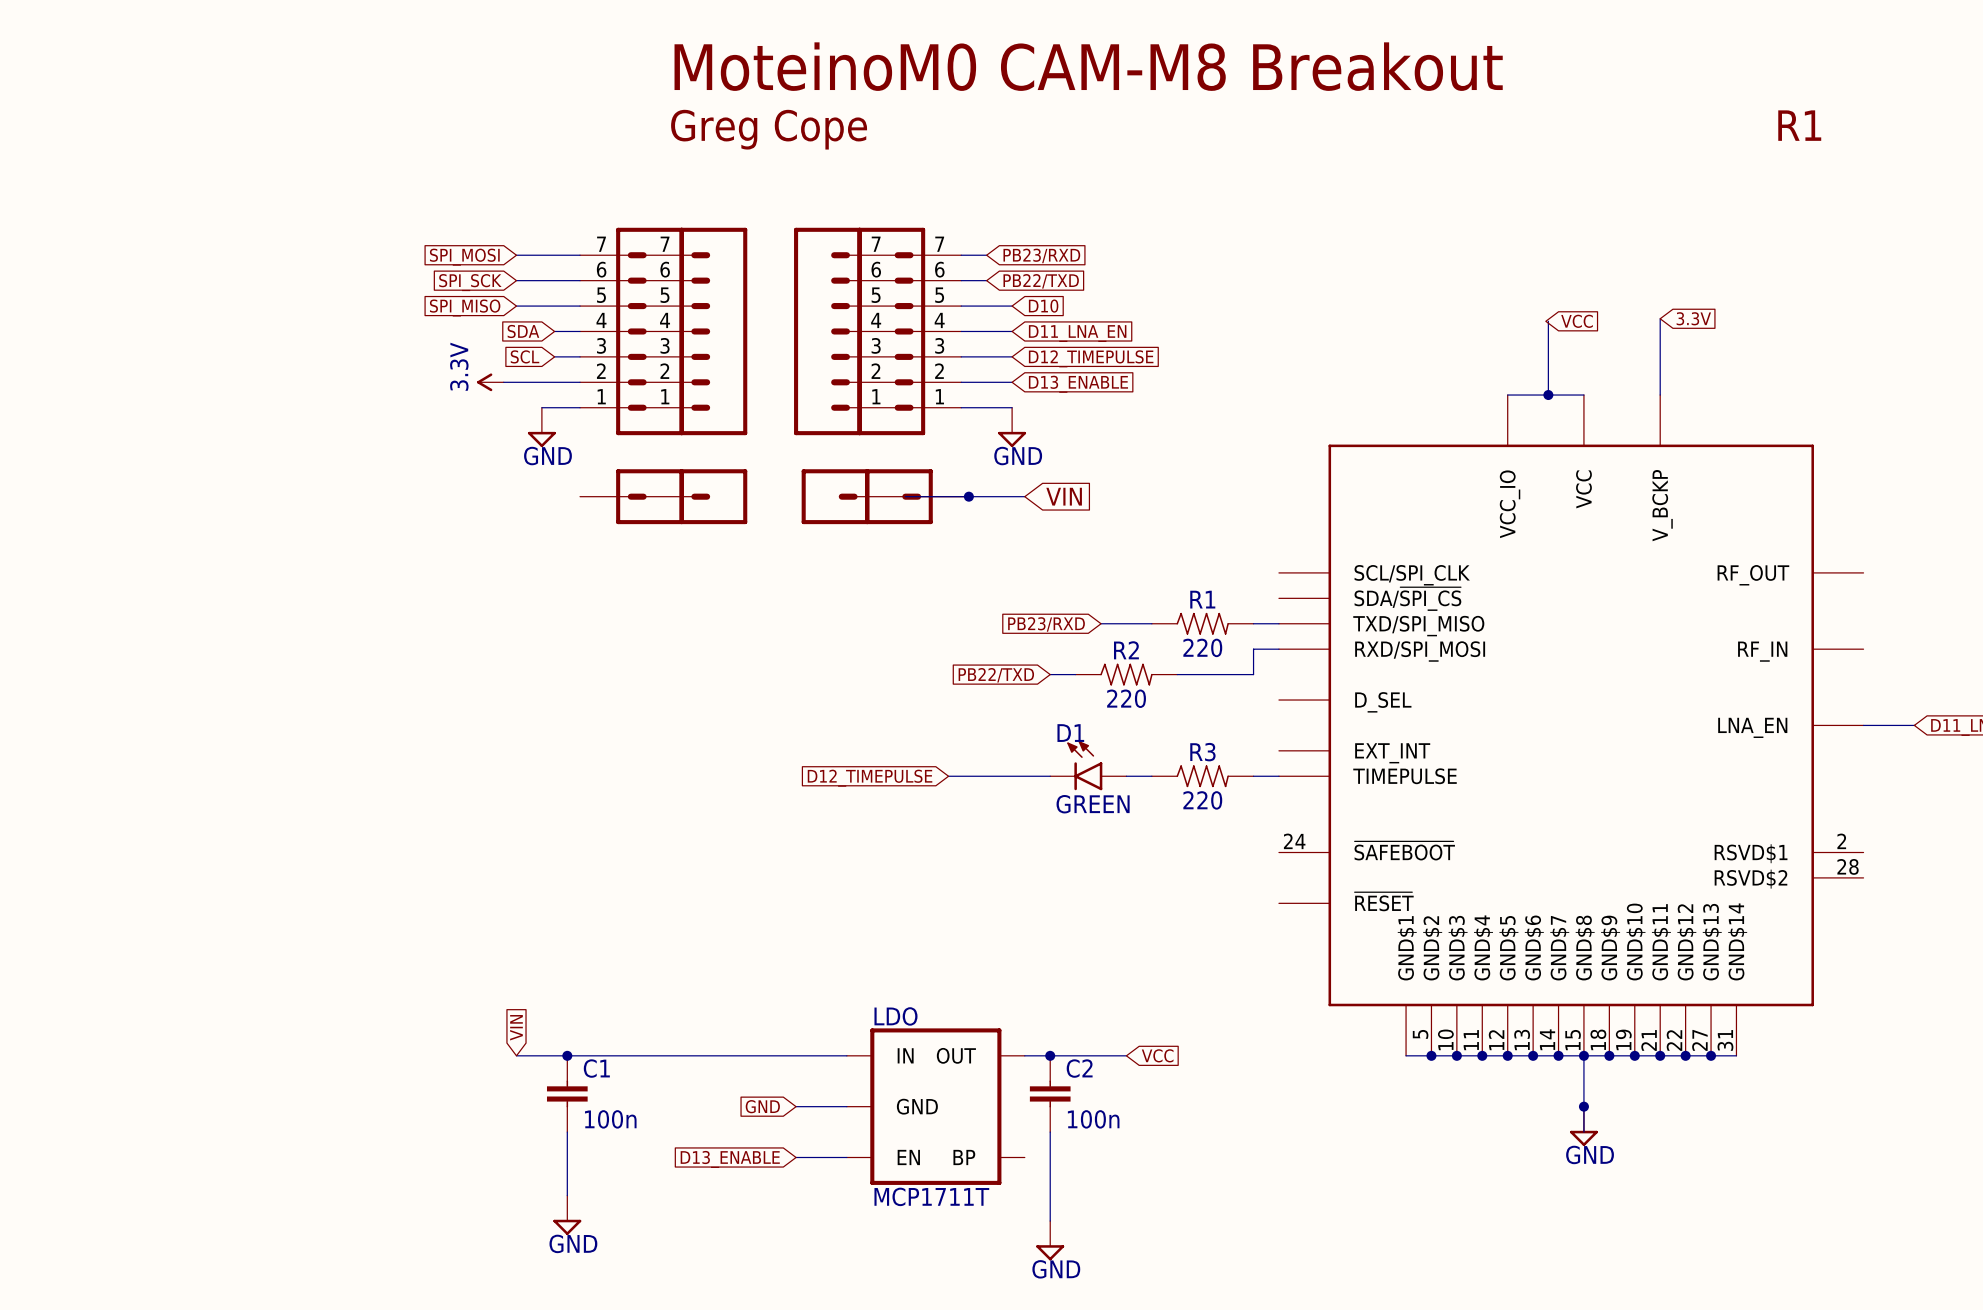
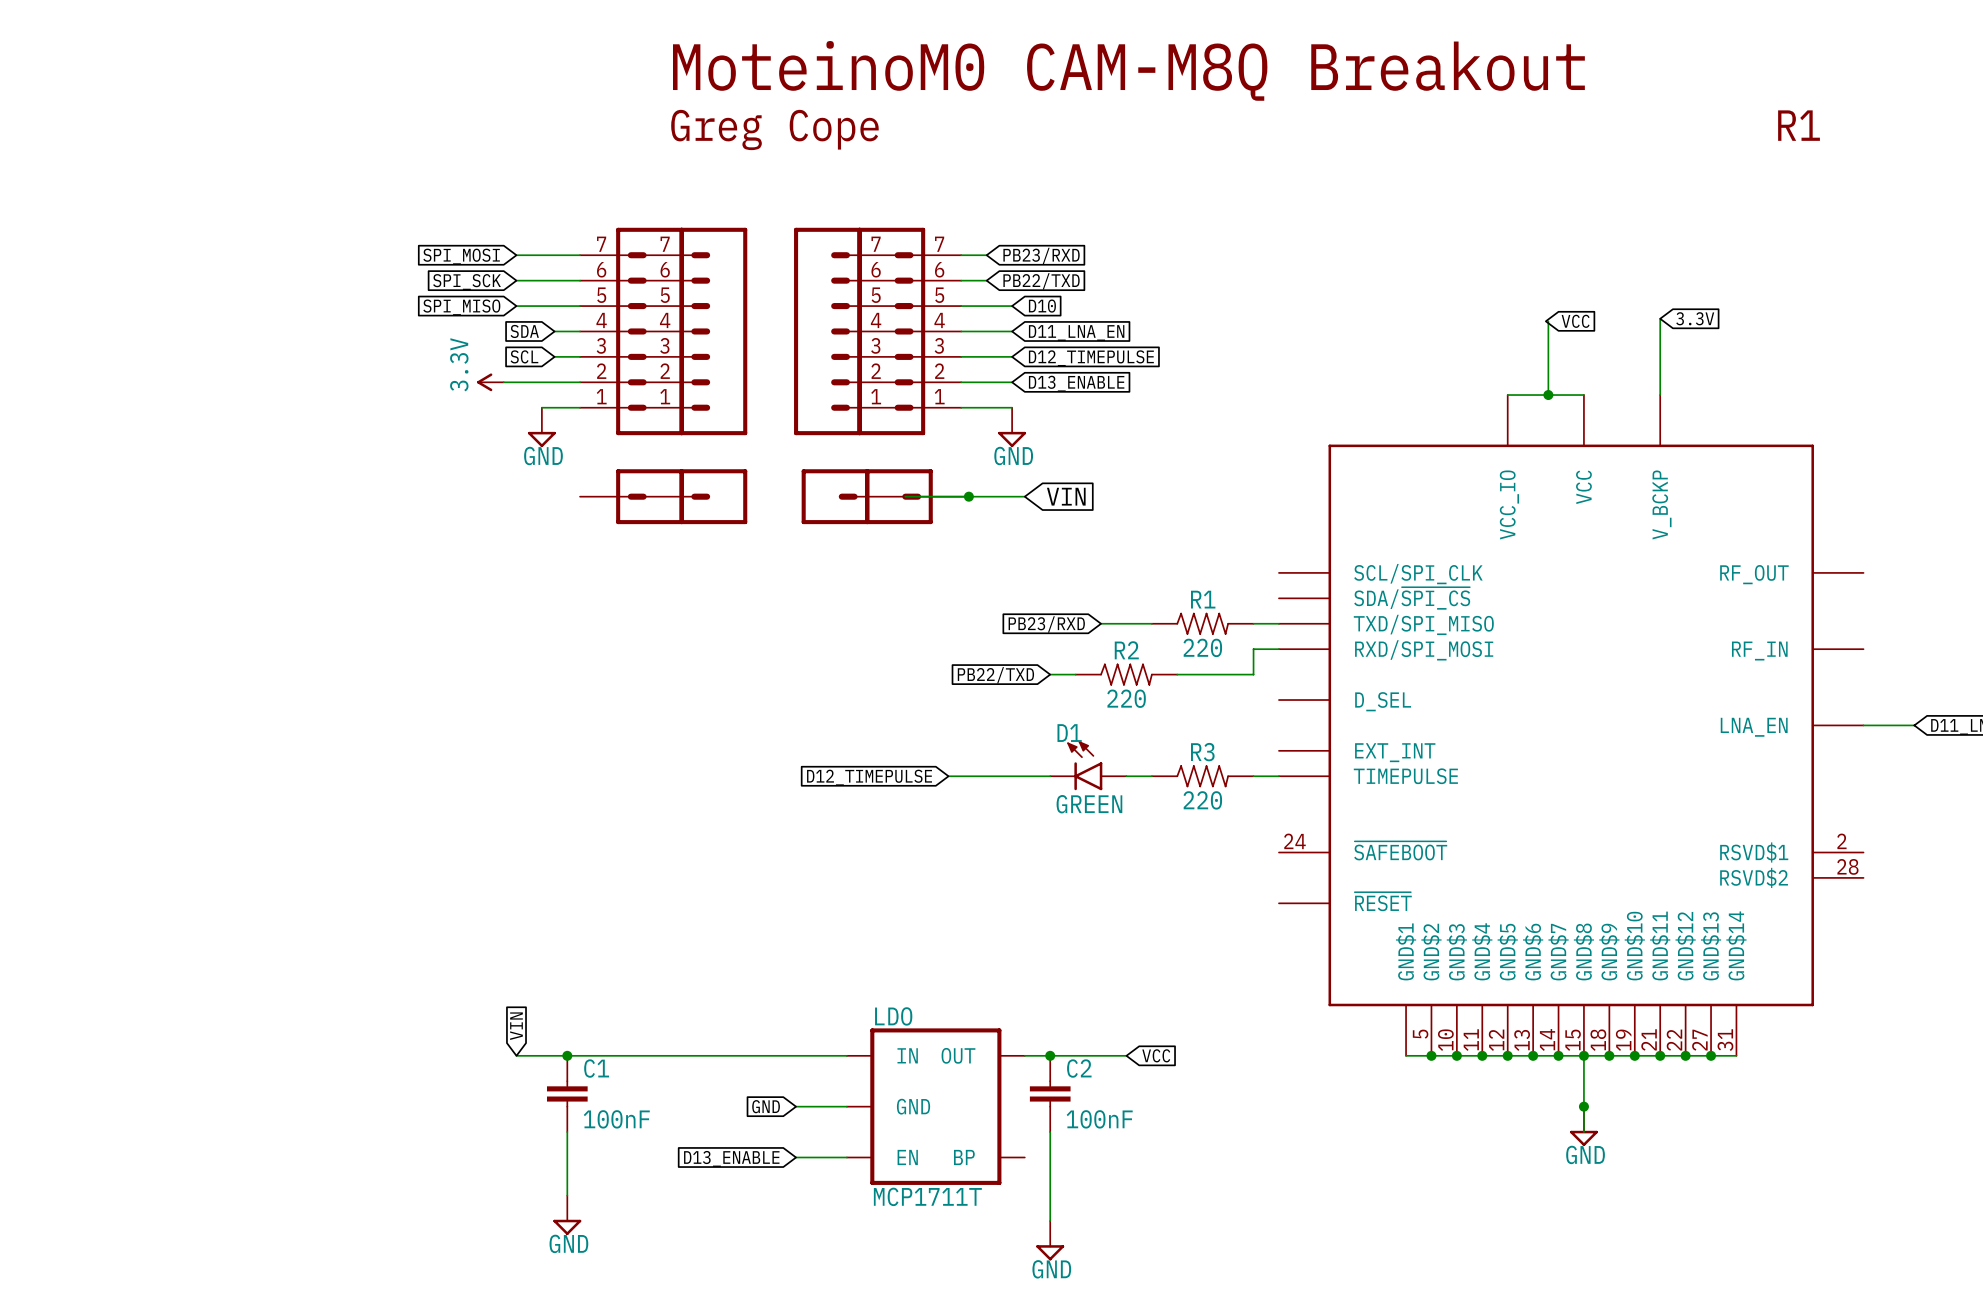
text: MoteinoM0 CAM-M8 Breakout (1088, 66) -> MoteinoM0 CAM-M8Q Breakout (1128, 70)
C1 value: 100n (610, 1119) -> 100nF (616, 1119)
C2 value: 100n (1093, 1119) -> 100nF (1099, 1119)

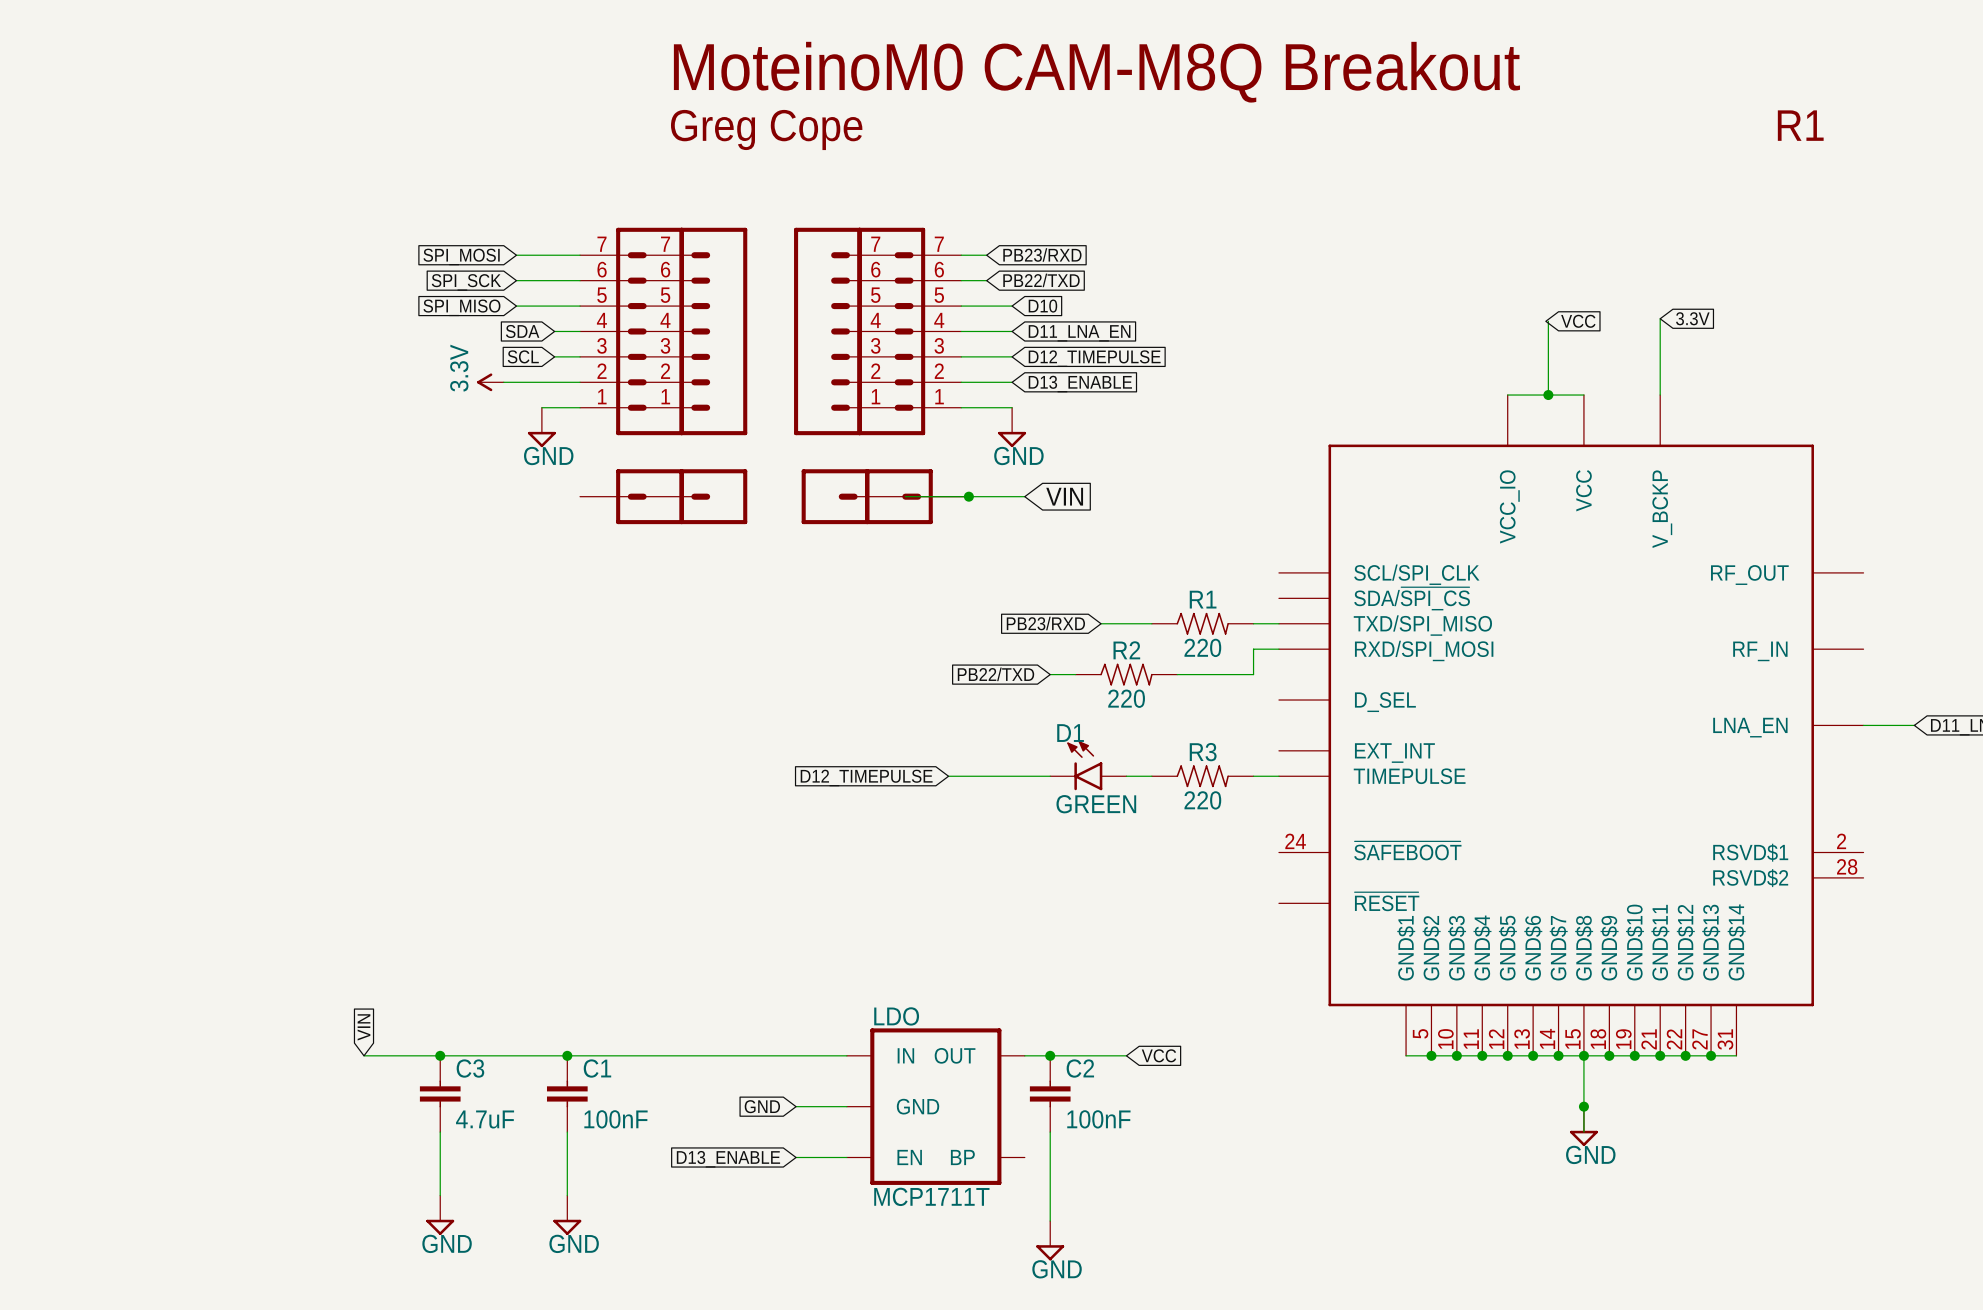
global label position: VIN (516, 1026) -> VIN (363, 1027)
wire: none -> (363, 1055) (516, 1055)
junction: none -> (440, 1055)
C3: none -> 4.7uF (440, 1093)
wire: none -> (440, 1132) (440, 1195)
power symbol: none -> GND (440, 1215)

